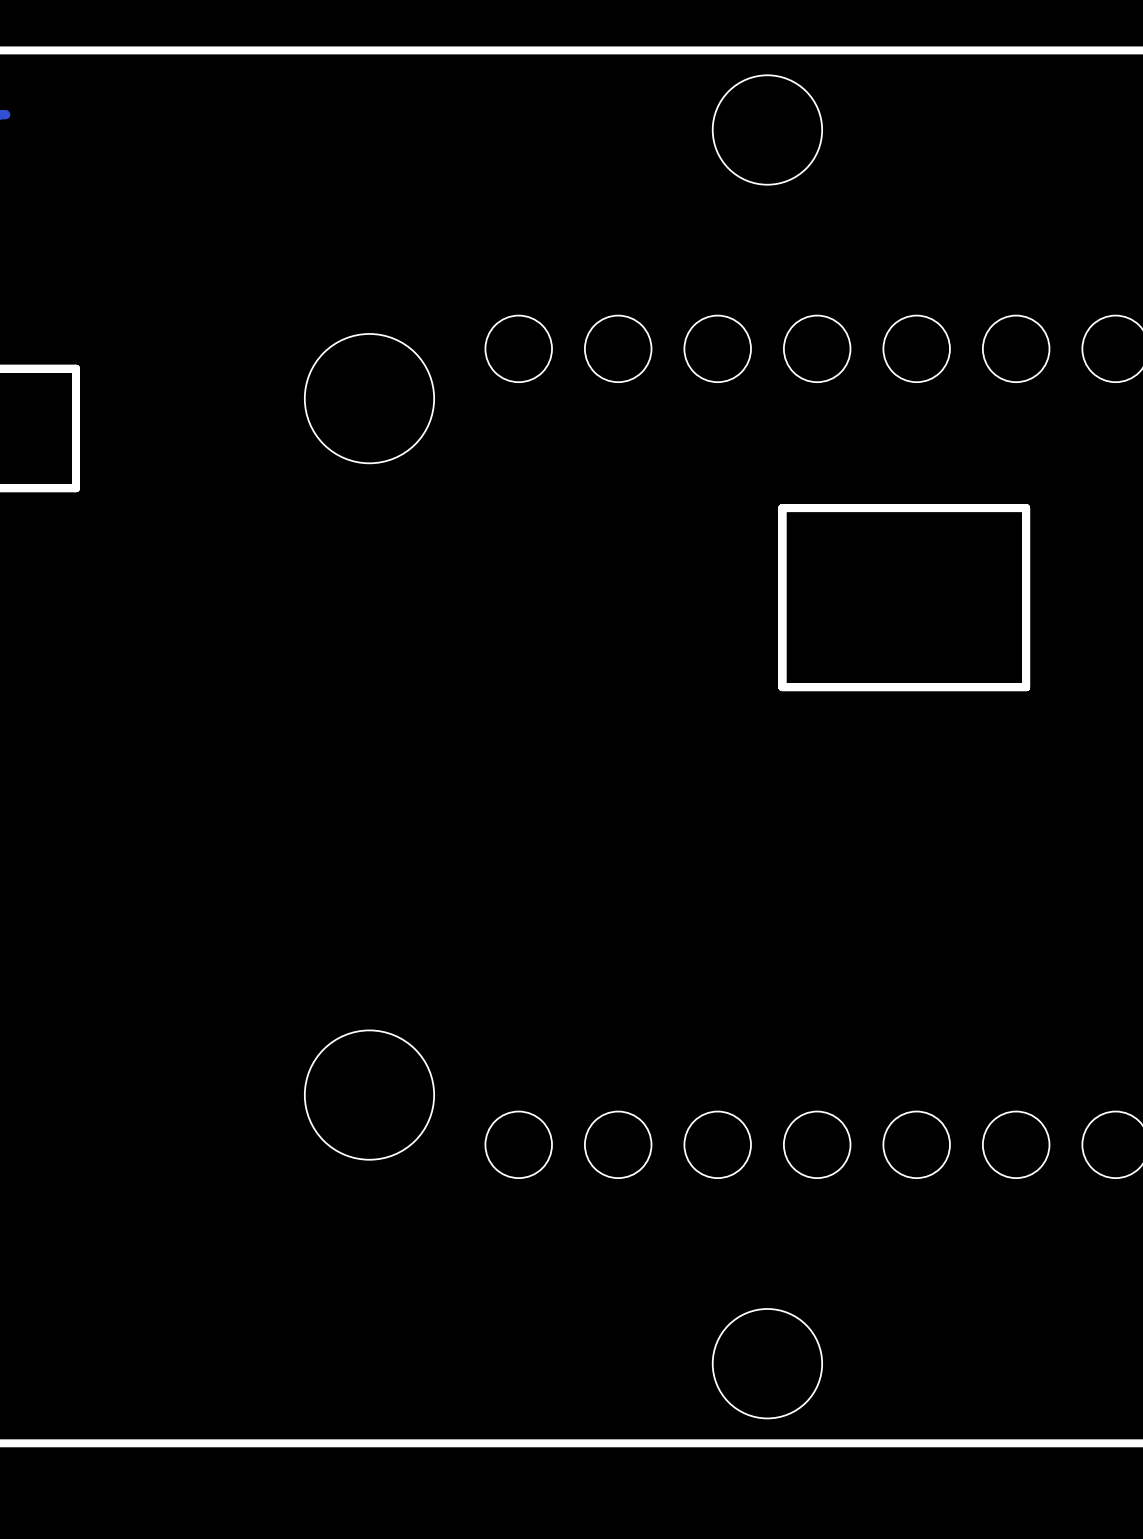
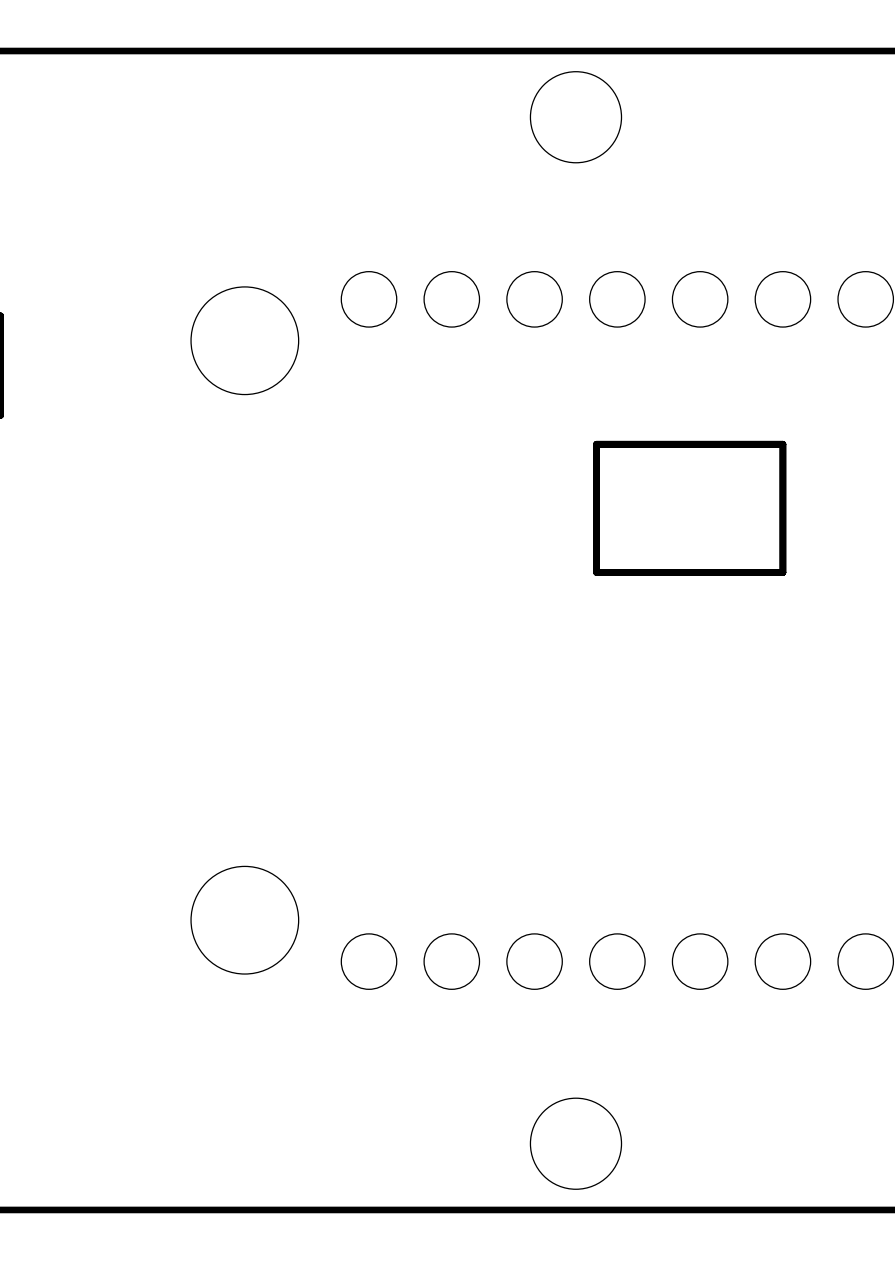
board edge: (1026, 508) (782, 508) (782, 687) (1026, 687) (1026, 508) -> (782, 444) (782, 572) (596, 572) (596, 444) (782, 444)

